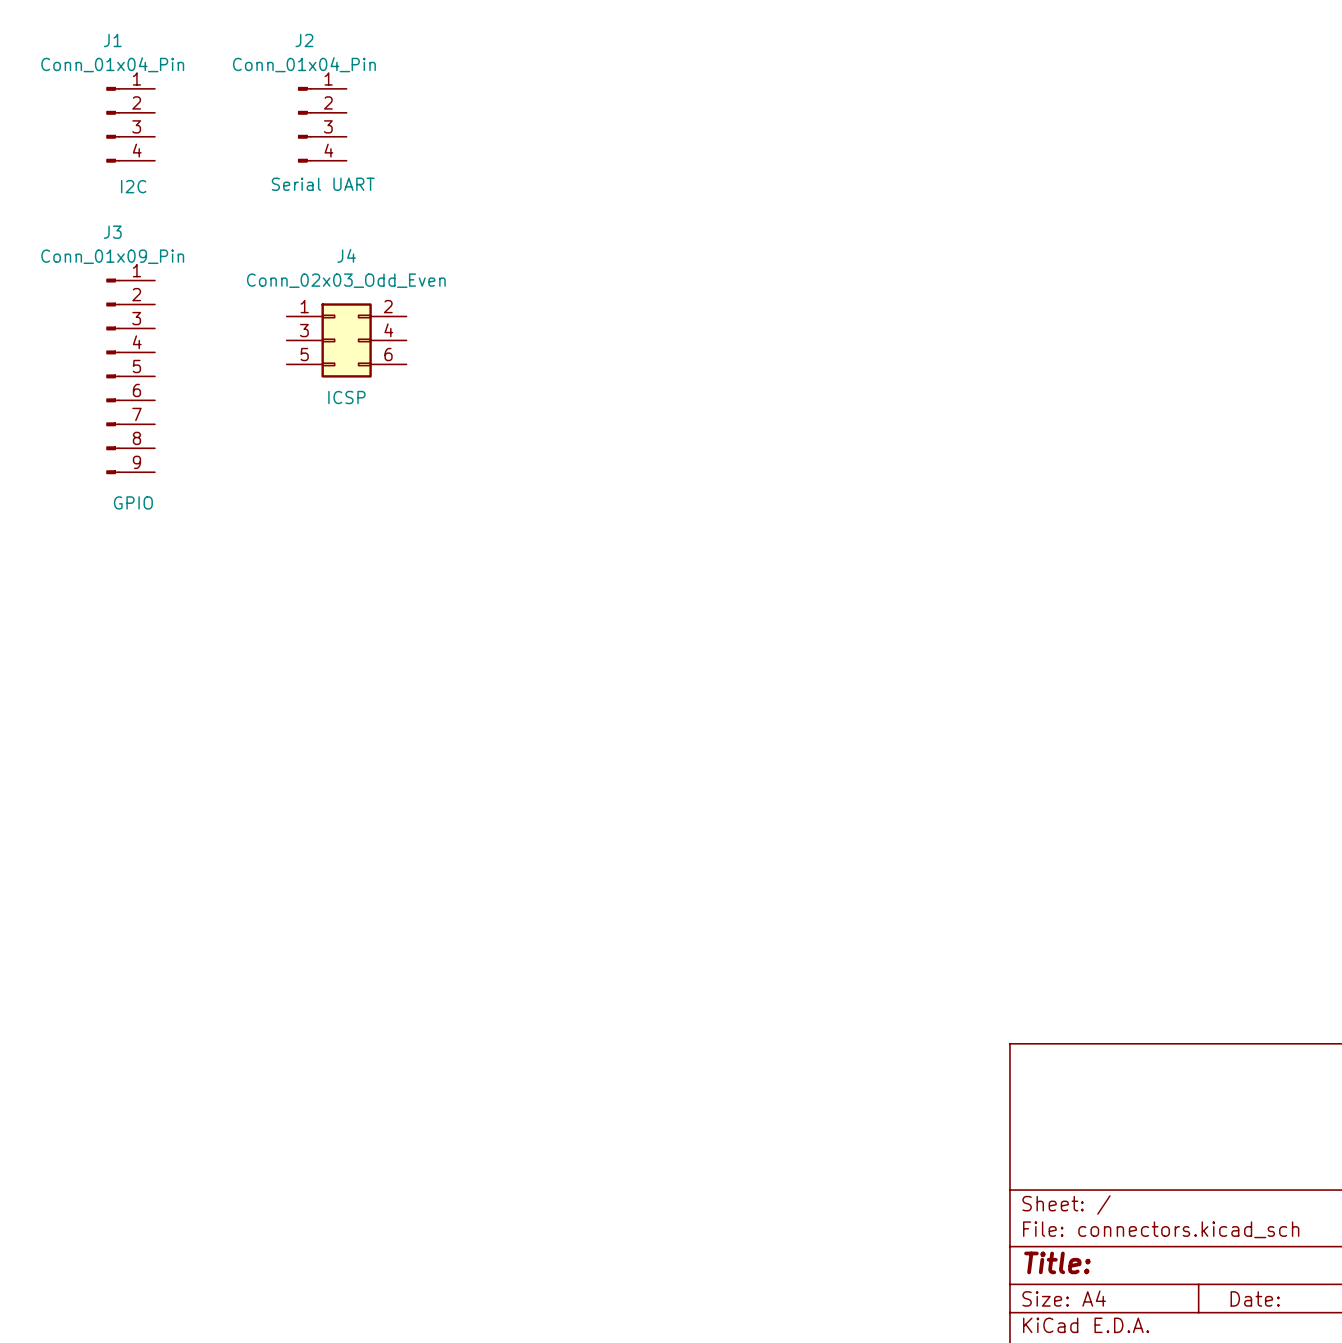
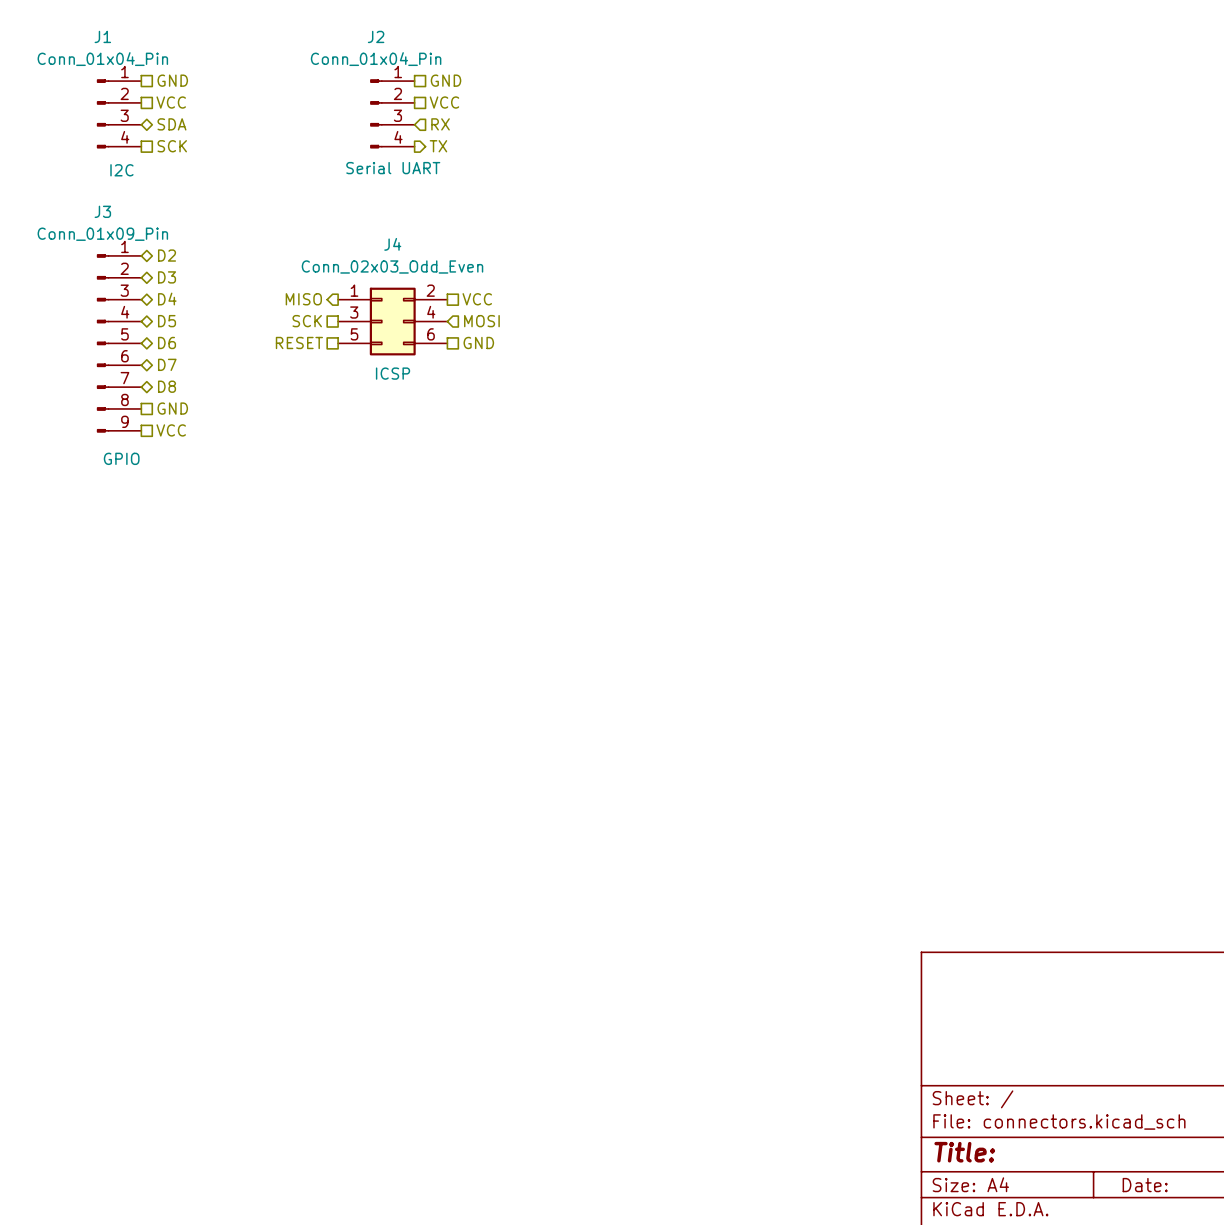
hierarchical label: none -> GND (172, 80)
hierarchical label: none -> GND (446, 80)
hierarchical label: none -> VCC (171, 102)
hierarchical label: none -> VCC (444, 102)
J2 position: (322, 124) -> (392, 113)
hierarchical label: none -> SDA (171, 124)
hierarchical label: none -> RX (440, 124)
hierarchical label: none -> SCK (172, 146)
hierarchical label: none -> TX (438, 146)
hierarchical label: none -> D2 (167, 255)
hierarchical label: none -> D3 (167, 277)
hierarchical label: none -> D4 (167, 299)
hierarchical label: none -> MISO (303, 299)
hierarchical label: none -> VCC (477, 299)
J4 position: (346, 340) -> (392, 321)
hierarchical label: none -> D5 (167, 321)
hierarchical label: none -> SCK (307, 321)
hierarchical label: none -> MOSI (481, 321)
hierarchical label: none -> D6 (167, 342)
hierarchical label: none -> RESET (299, 342)
hierarchical label: none -> GND (478, 342)
hierarchical label: none -> D7 (167, 364)
hierarchical label: none -> D8 (167, 386)
hierarchical label: none -> GND (172, 408)
hierarchical label: none -> VCC (171, 430)

